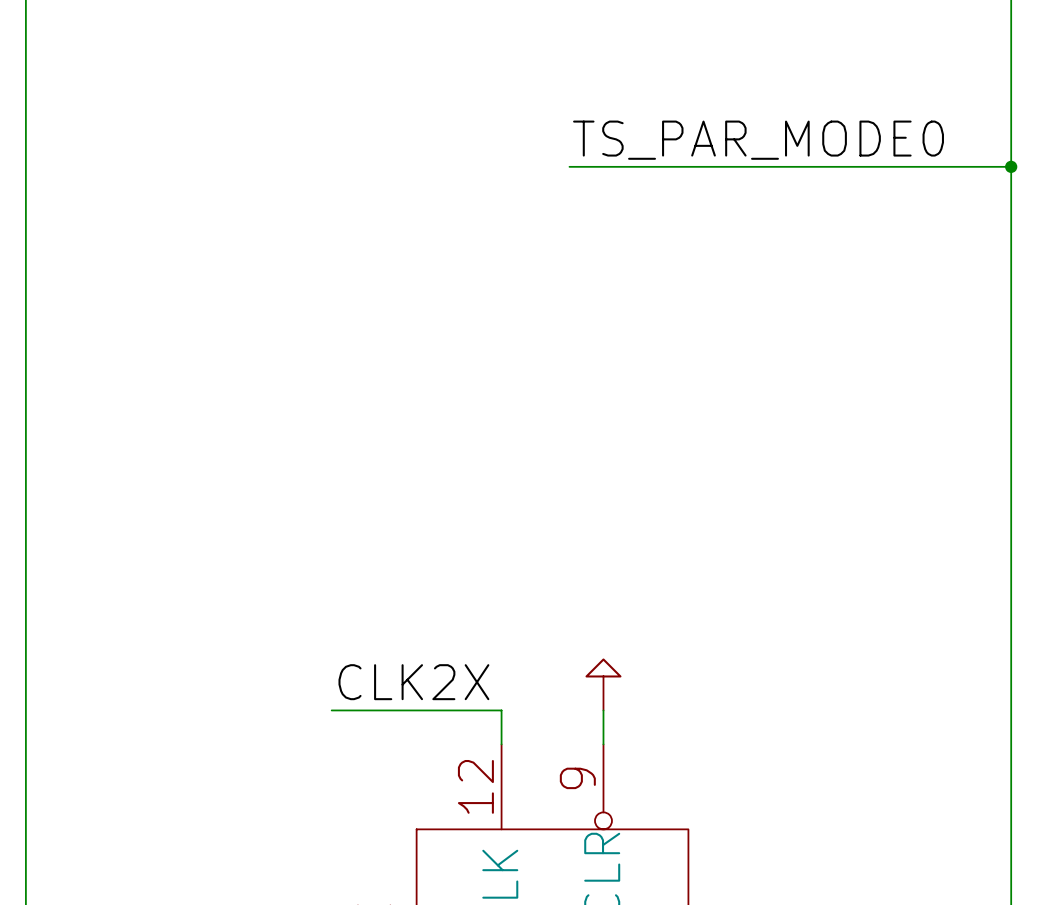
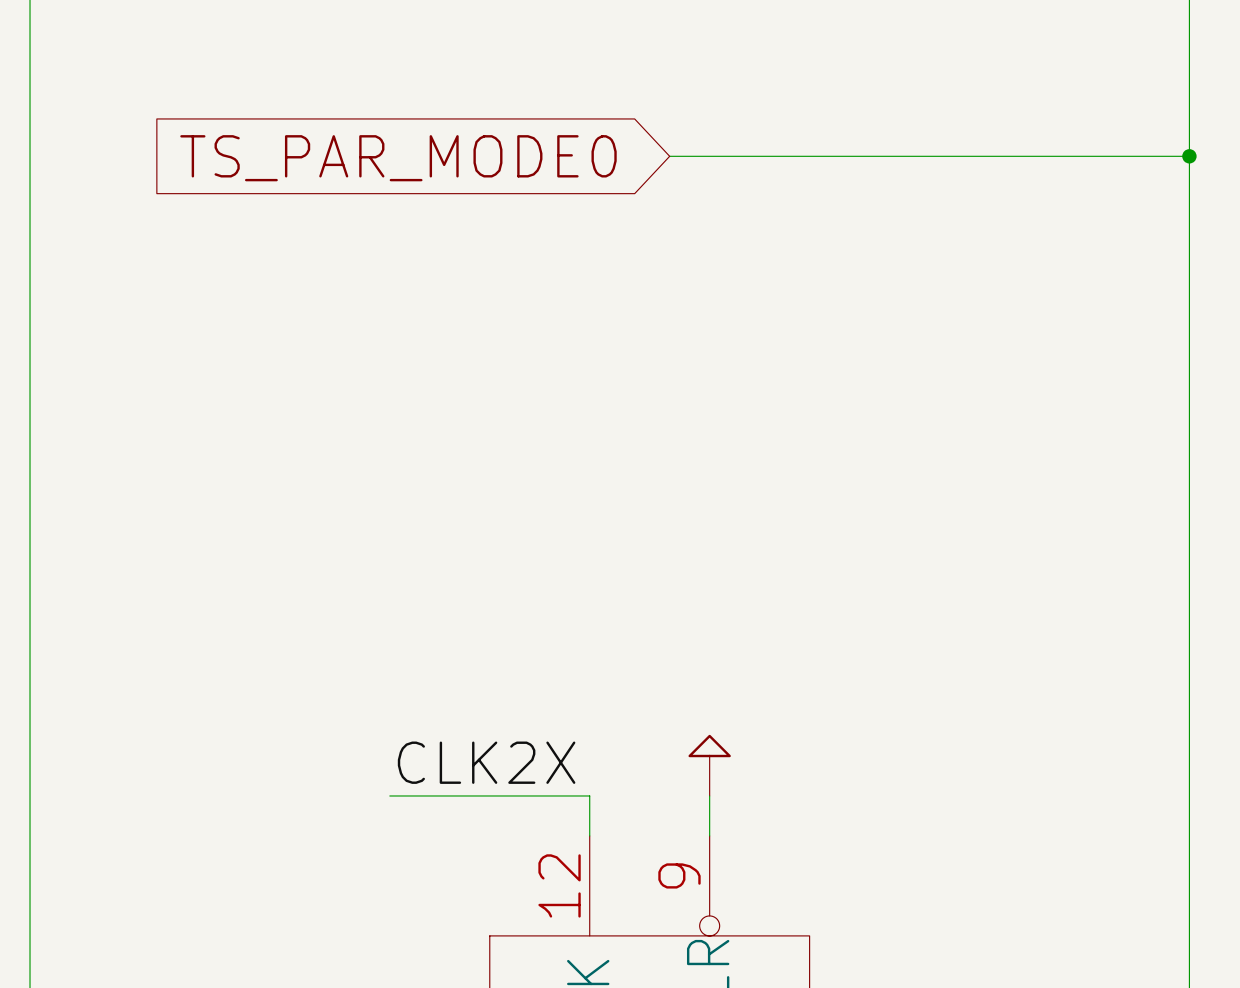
label: TS_PAR_MODE0 (758, 140) -> none
global label: none -> TS_PAR_MODE0 (398, 158)

